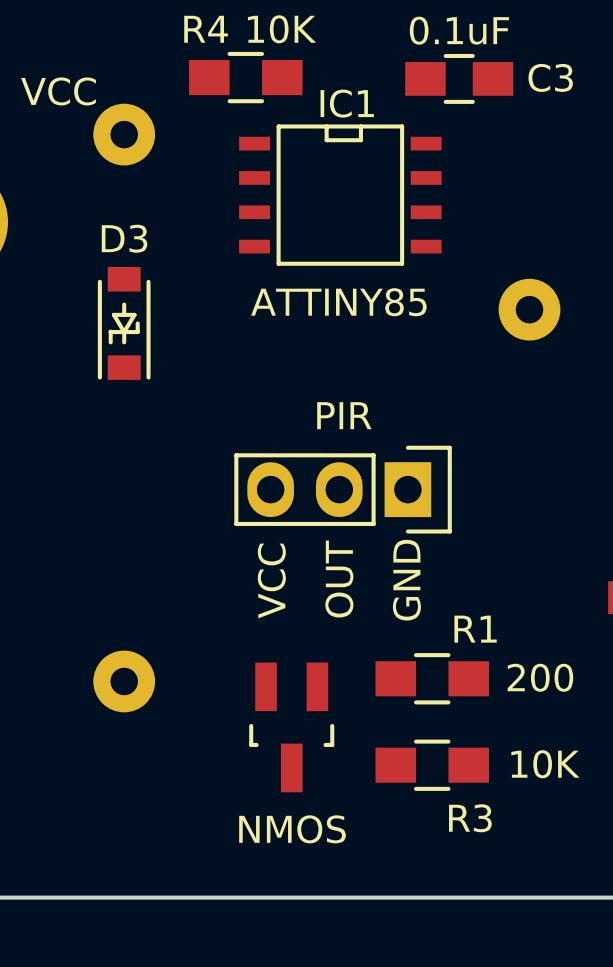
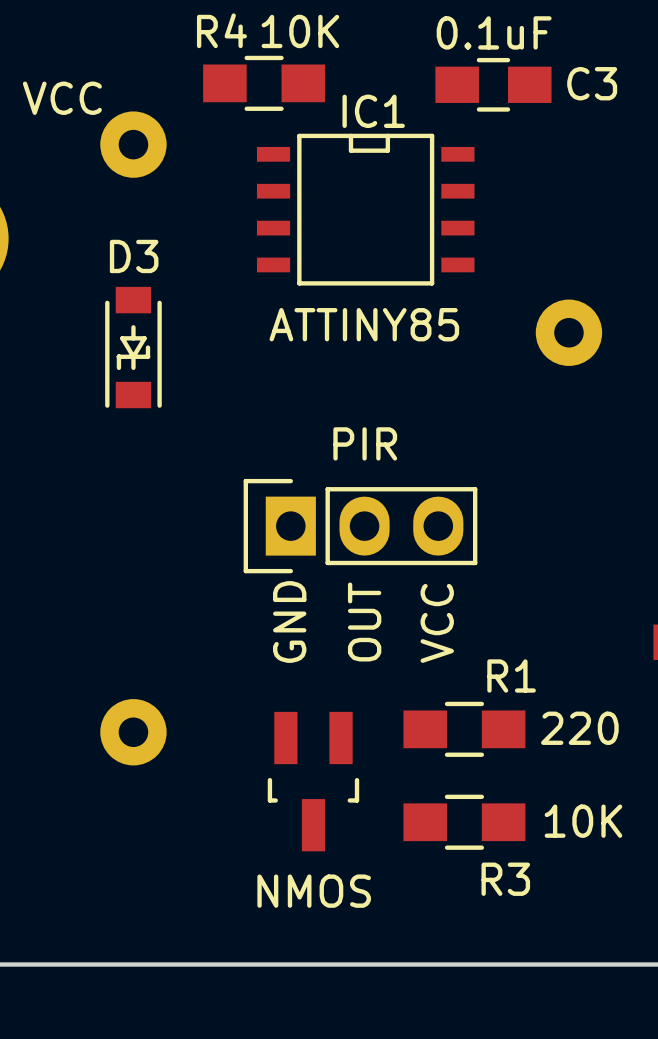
part rotation: 0° (343, 489) -> 180° (360, 526)
text: GND (406, 580) -> VCC (437, 623)
text: VCC (271, 581) -> GND (289, 621)
R1 value: 200 (540, 677) -> 220 (579, 728)

